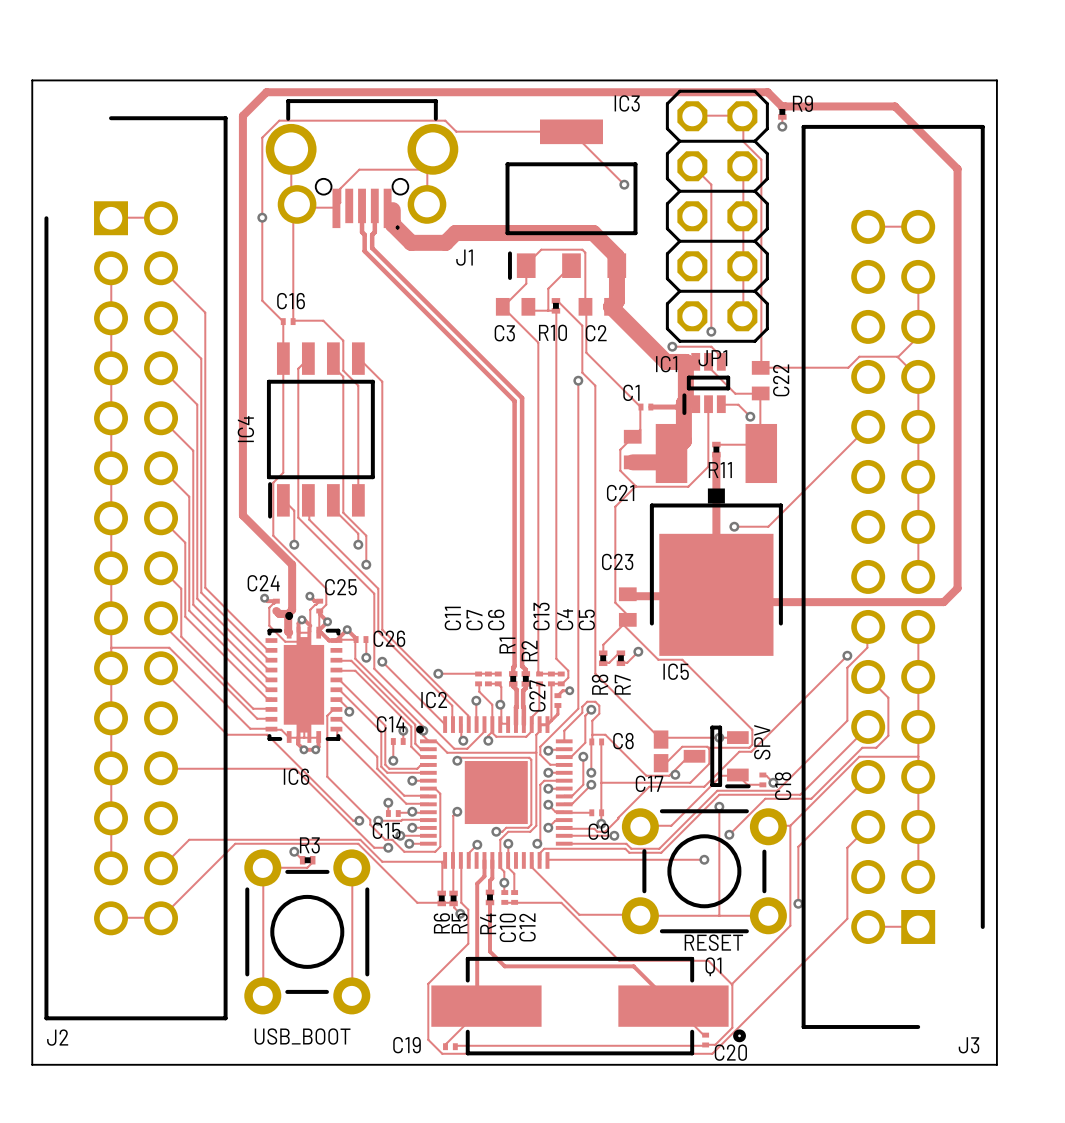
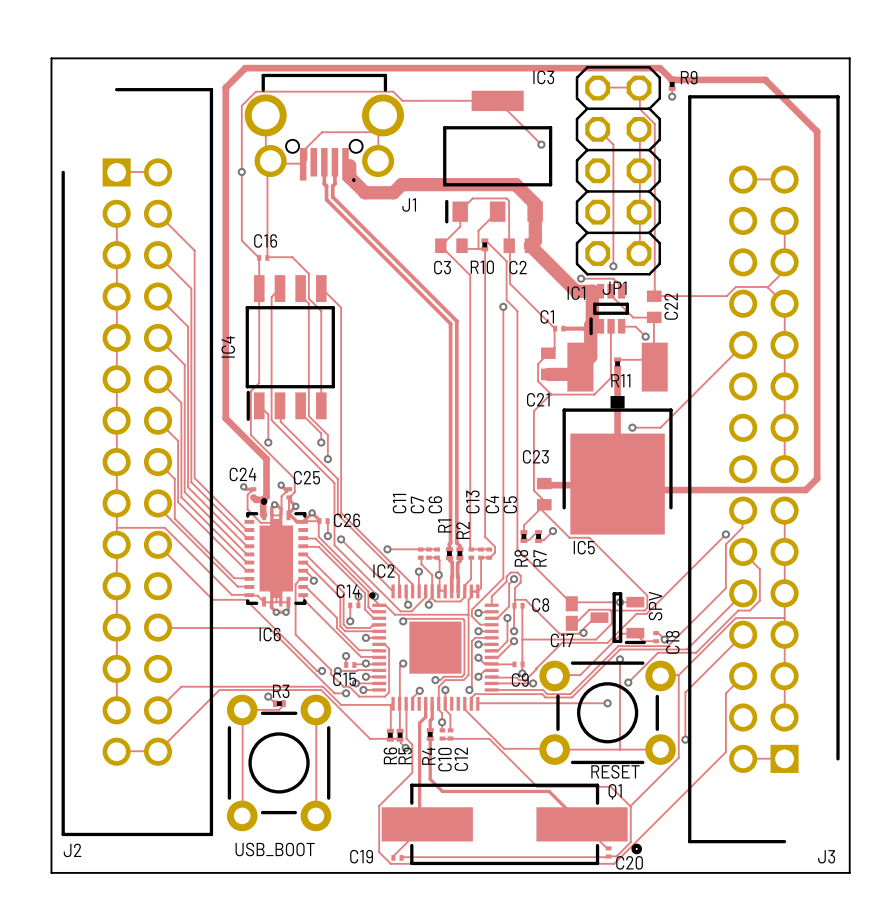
track: (569, 690) (562, 690) (557, 695) -> none
via: (569, 690) -> none
C27: (557, 700) -> none
track: (557, 705) (557, 714) (547, 724) -> none

